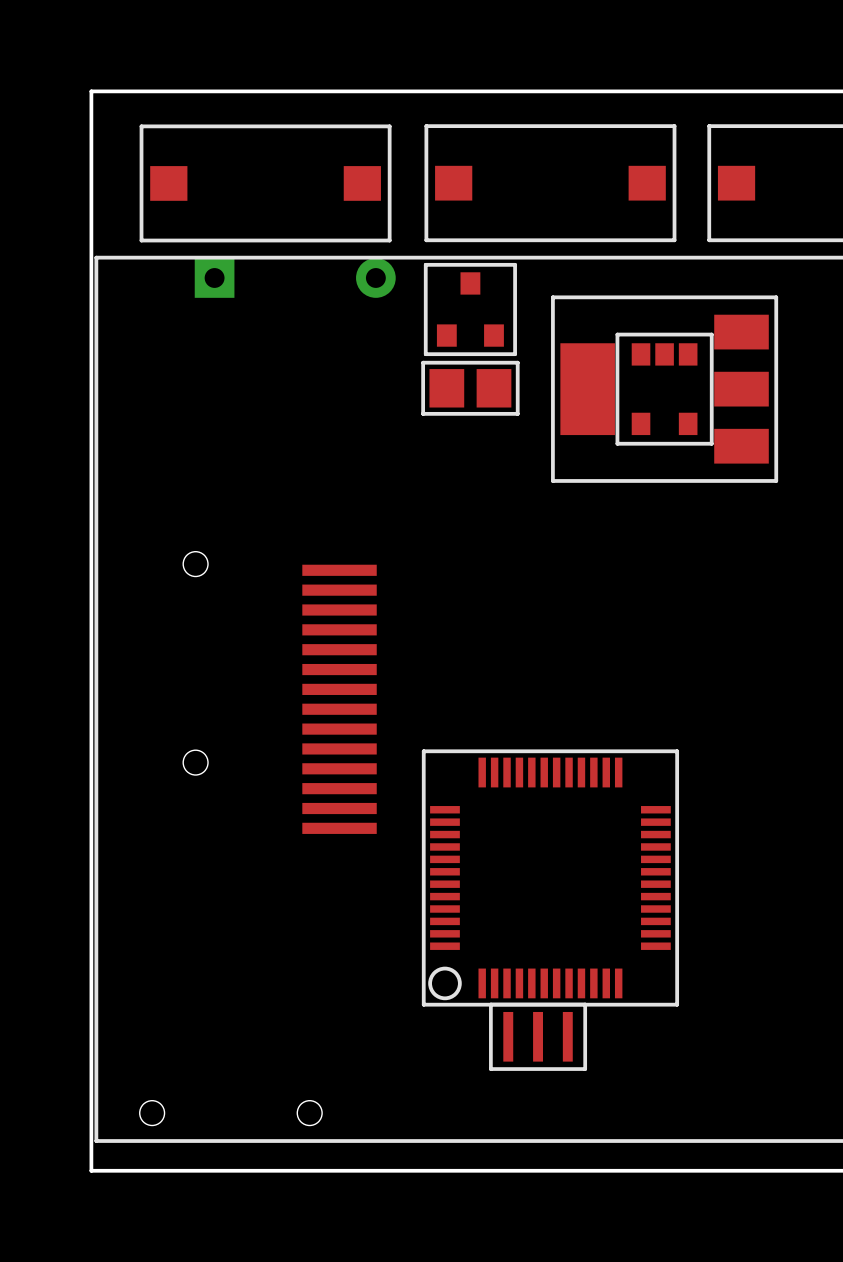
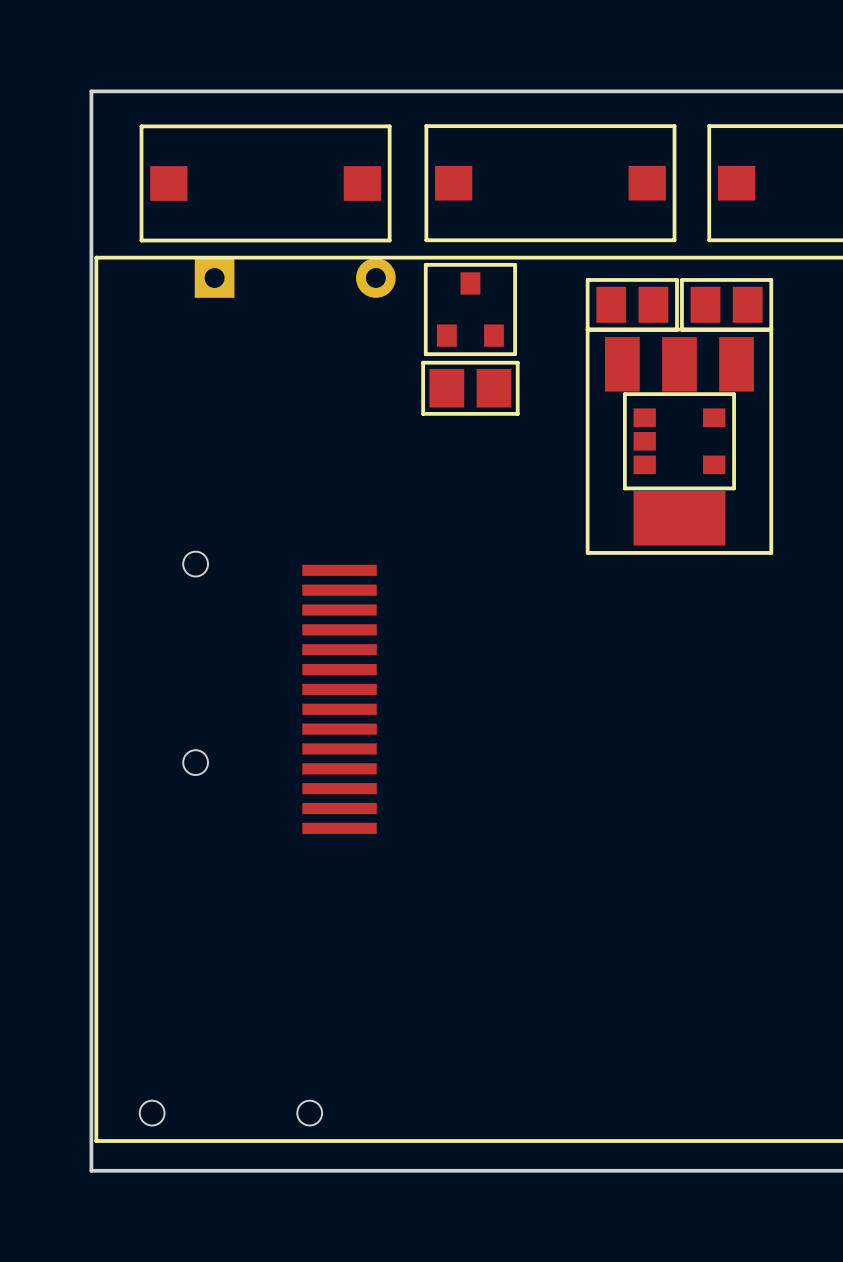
part: none -> (632, 304)
part: none -> (726, 304)
part rotation: 0° (664, 389) -> 90° counterclockwise (679, 441)
part rotation: 0° (664, 389) -> 90° counterclockwise (679, 441)
part: (550, 877) -> none
part: (538, 1036) -> none

